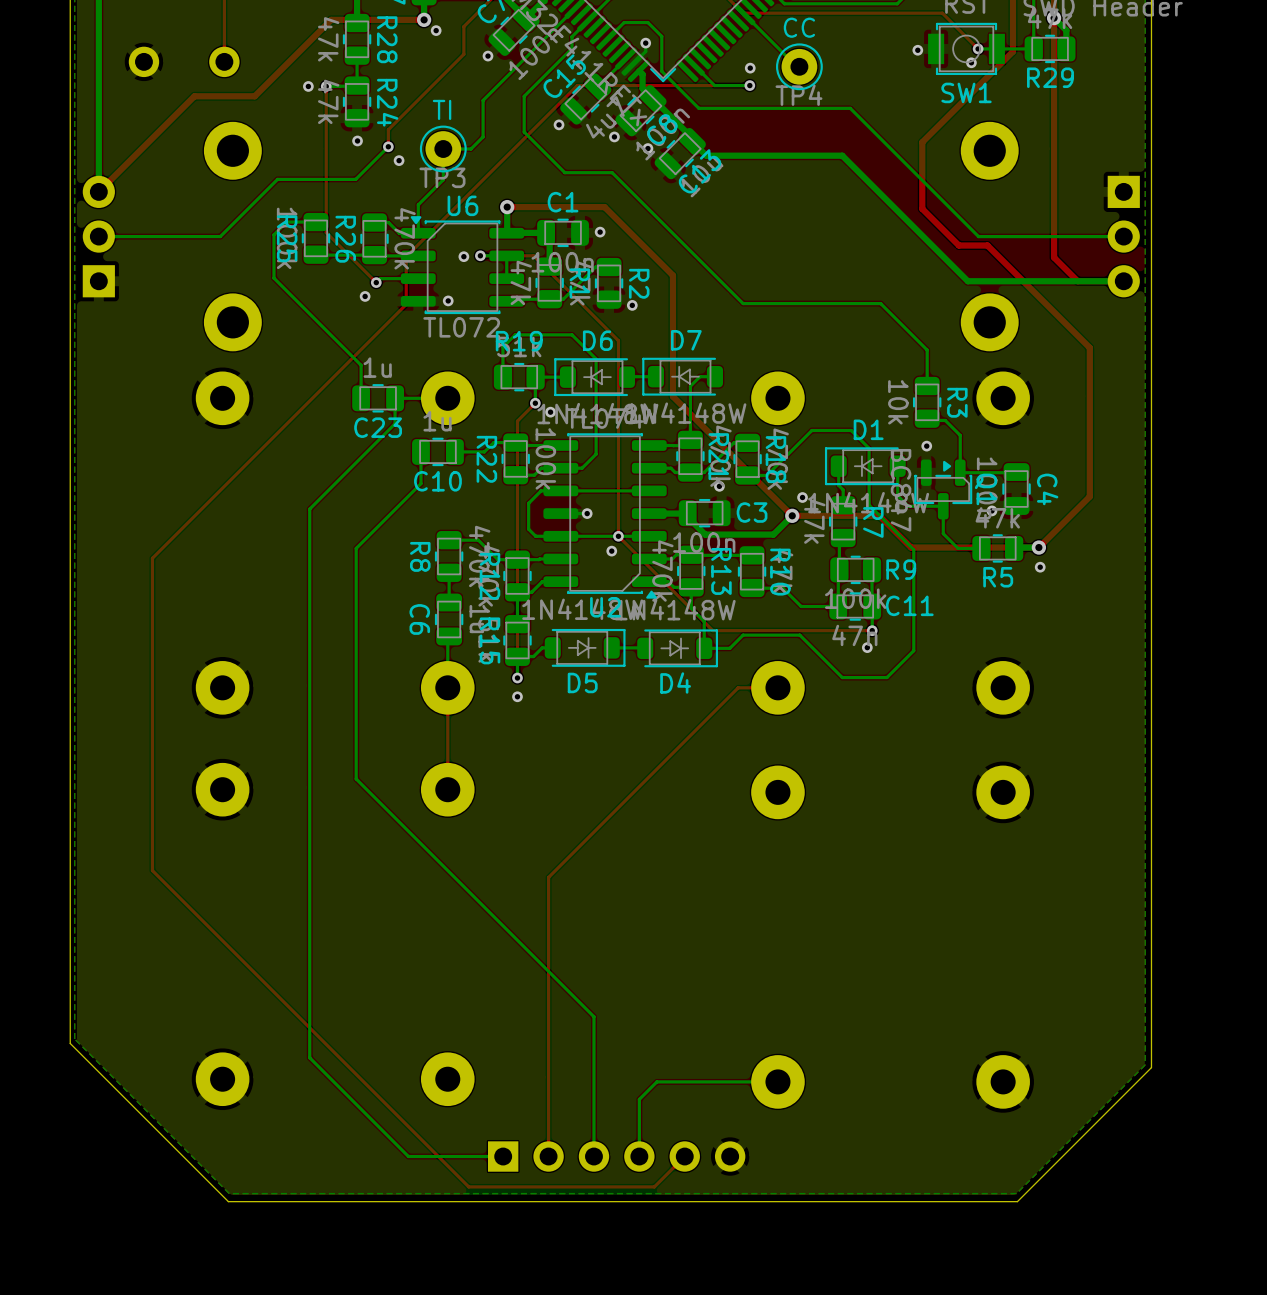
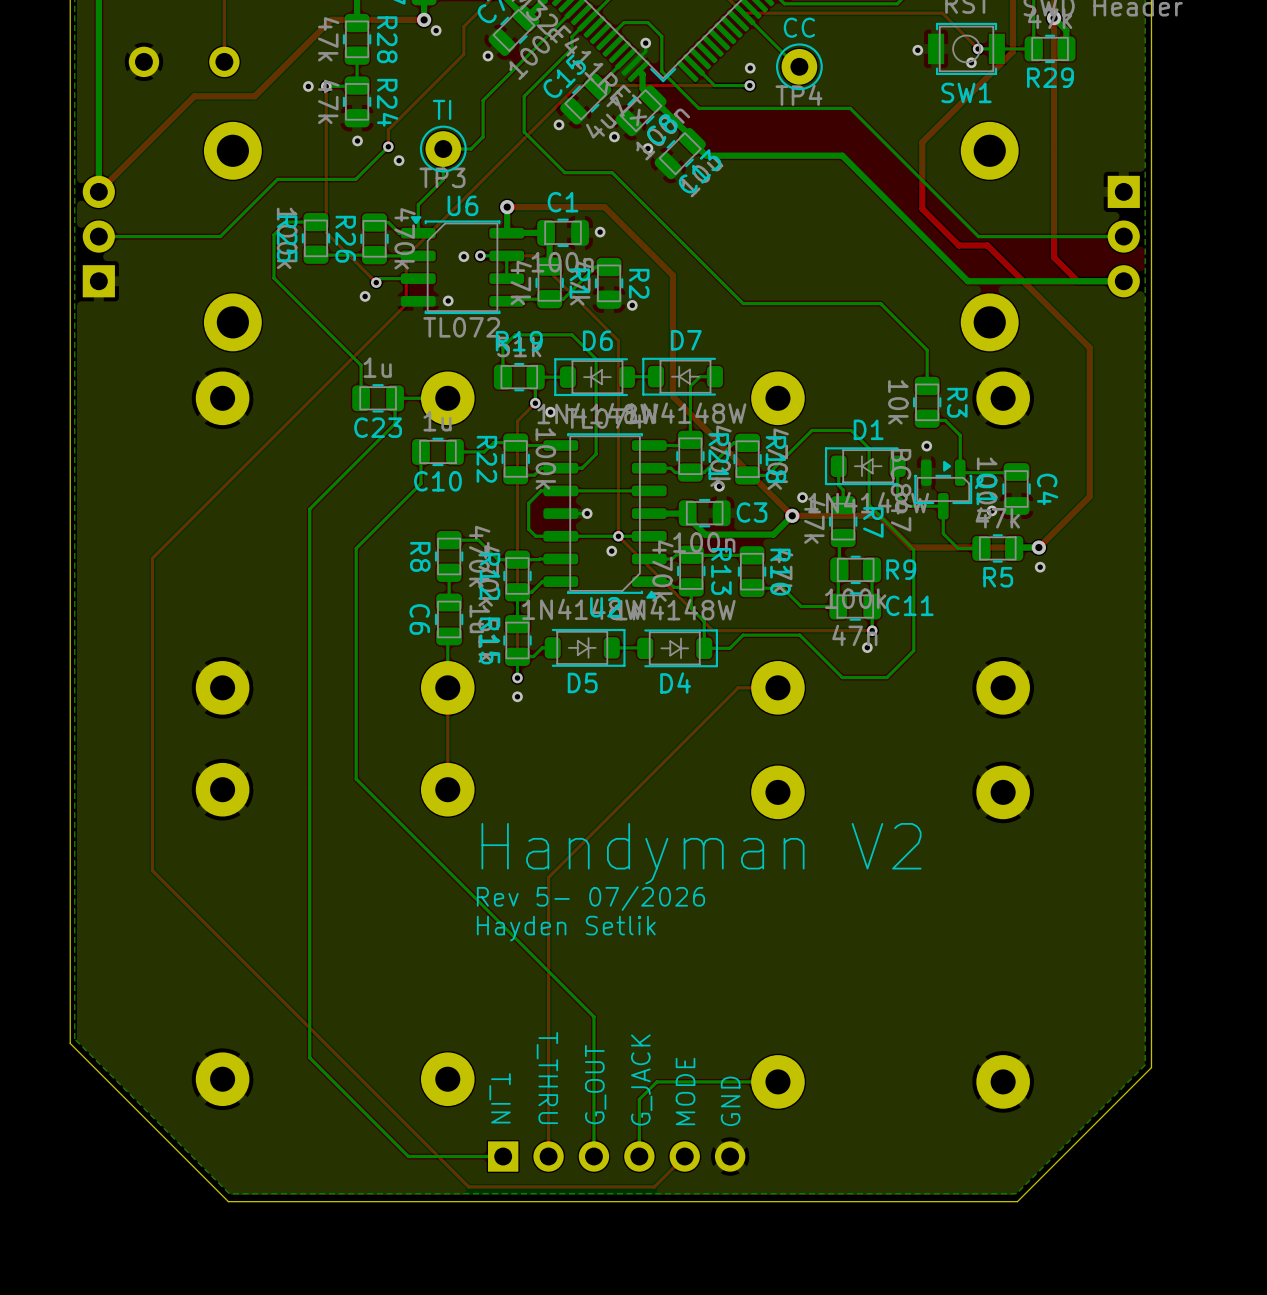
text: none -> Handyman V2 (701, 853)
text: none -> Rev 5- 07/2026 (590, 898)
text: none -> Hayden Setlik (566, 928)
text: none -> T_THRU (547, 1078)
text: none -> G_JACK (641, 1080)
text: none -> G_OUT (595, 1084)
text: none -> MODE (685, 1091)
text: none -> T_IN (500, 1098)
text: none -> GND (730, 1101)

